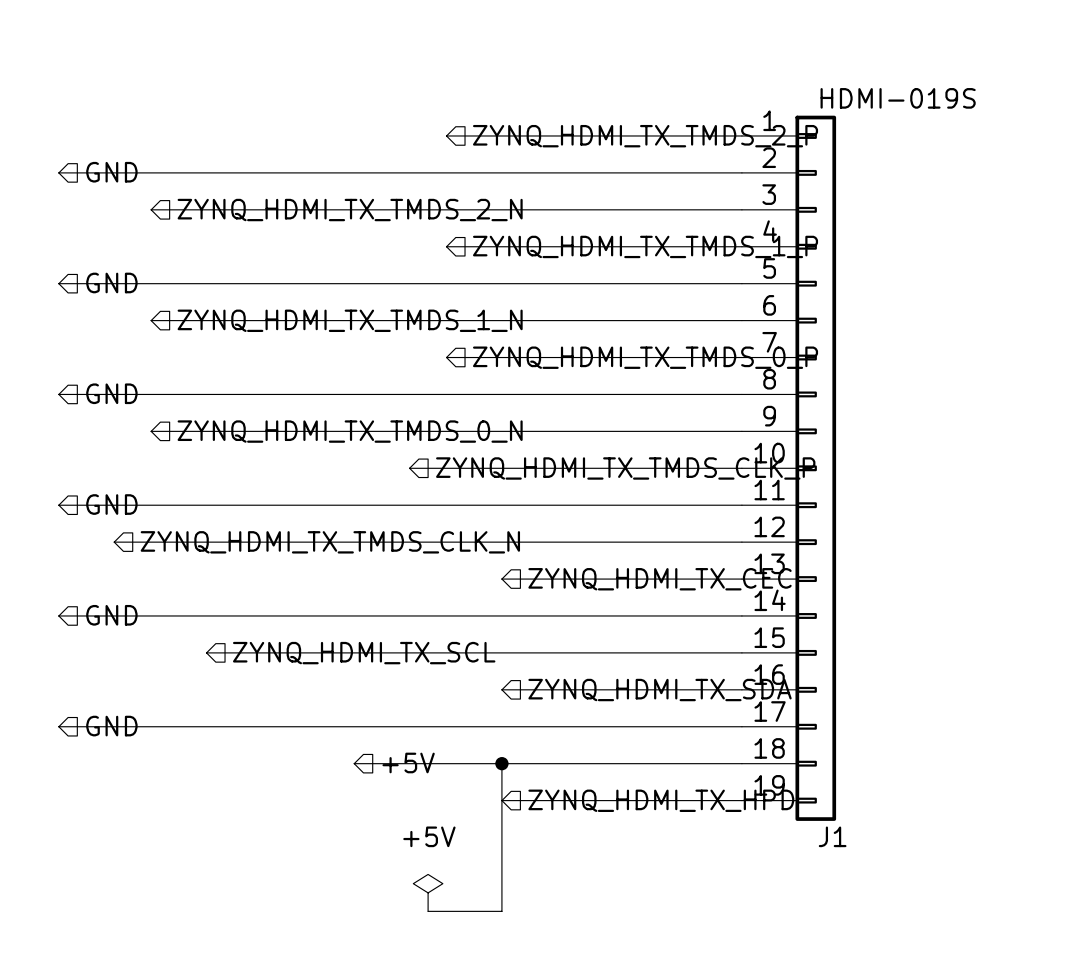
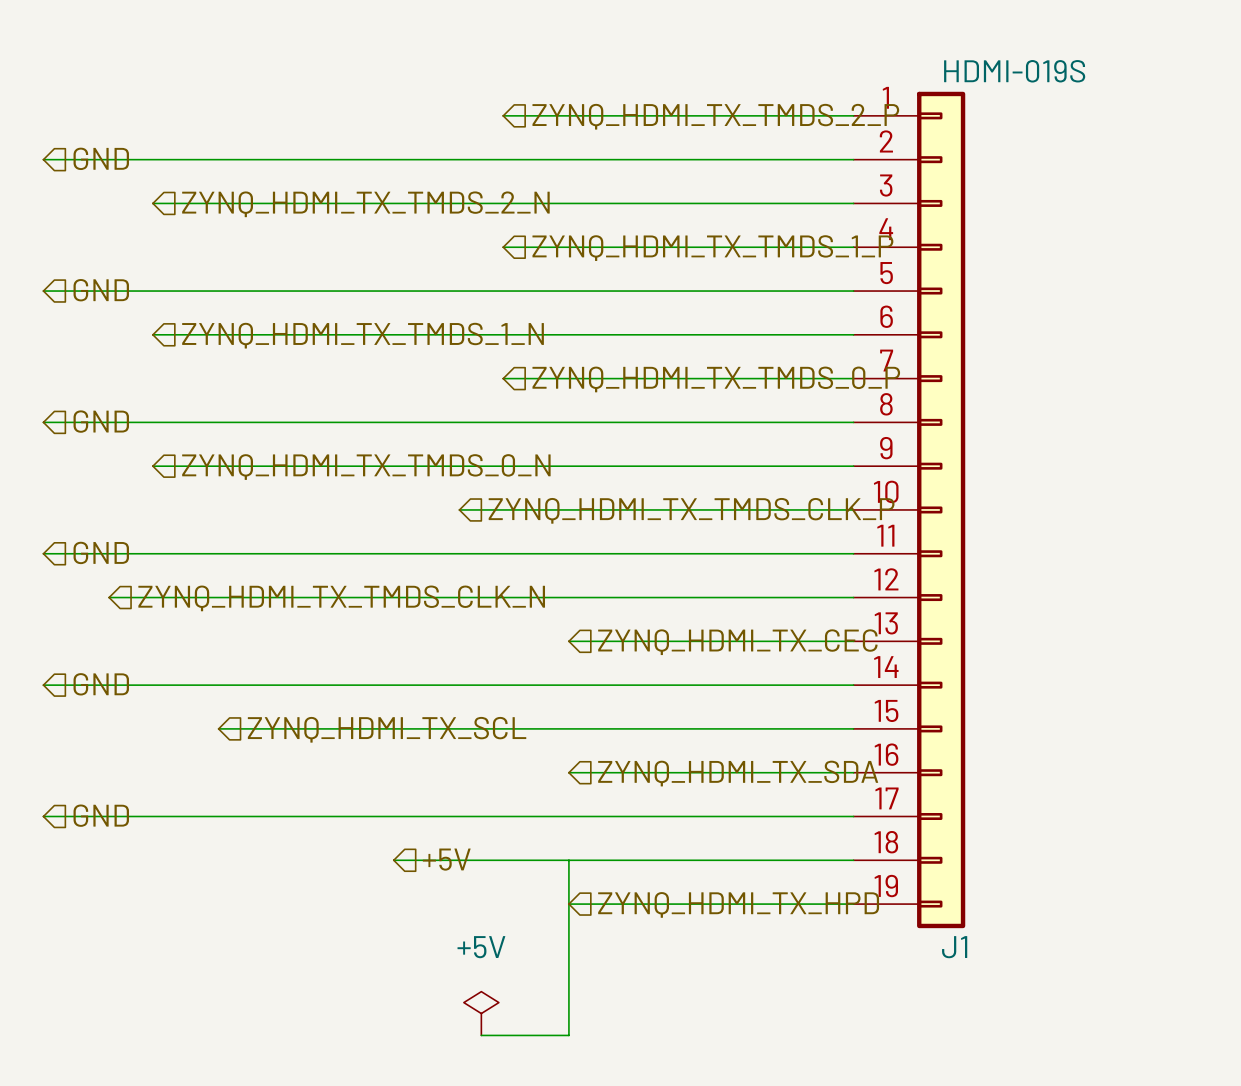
junction: (501, 763) -> none

